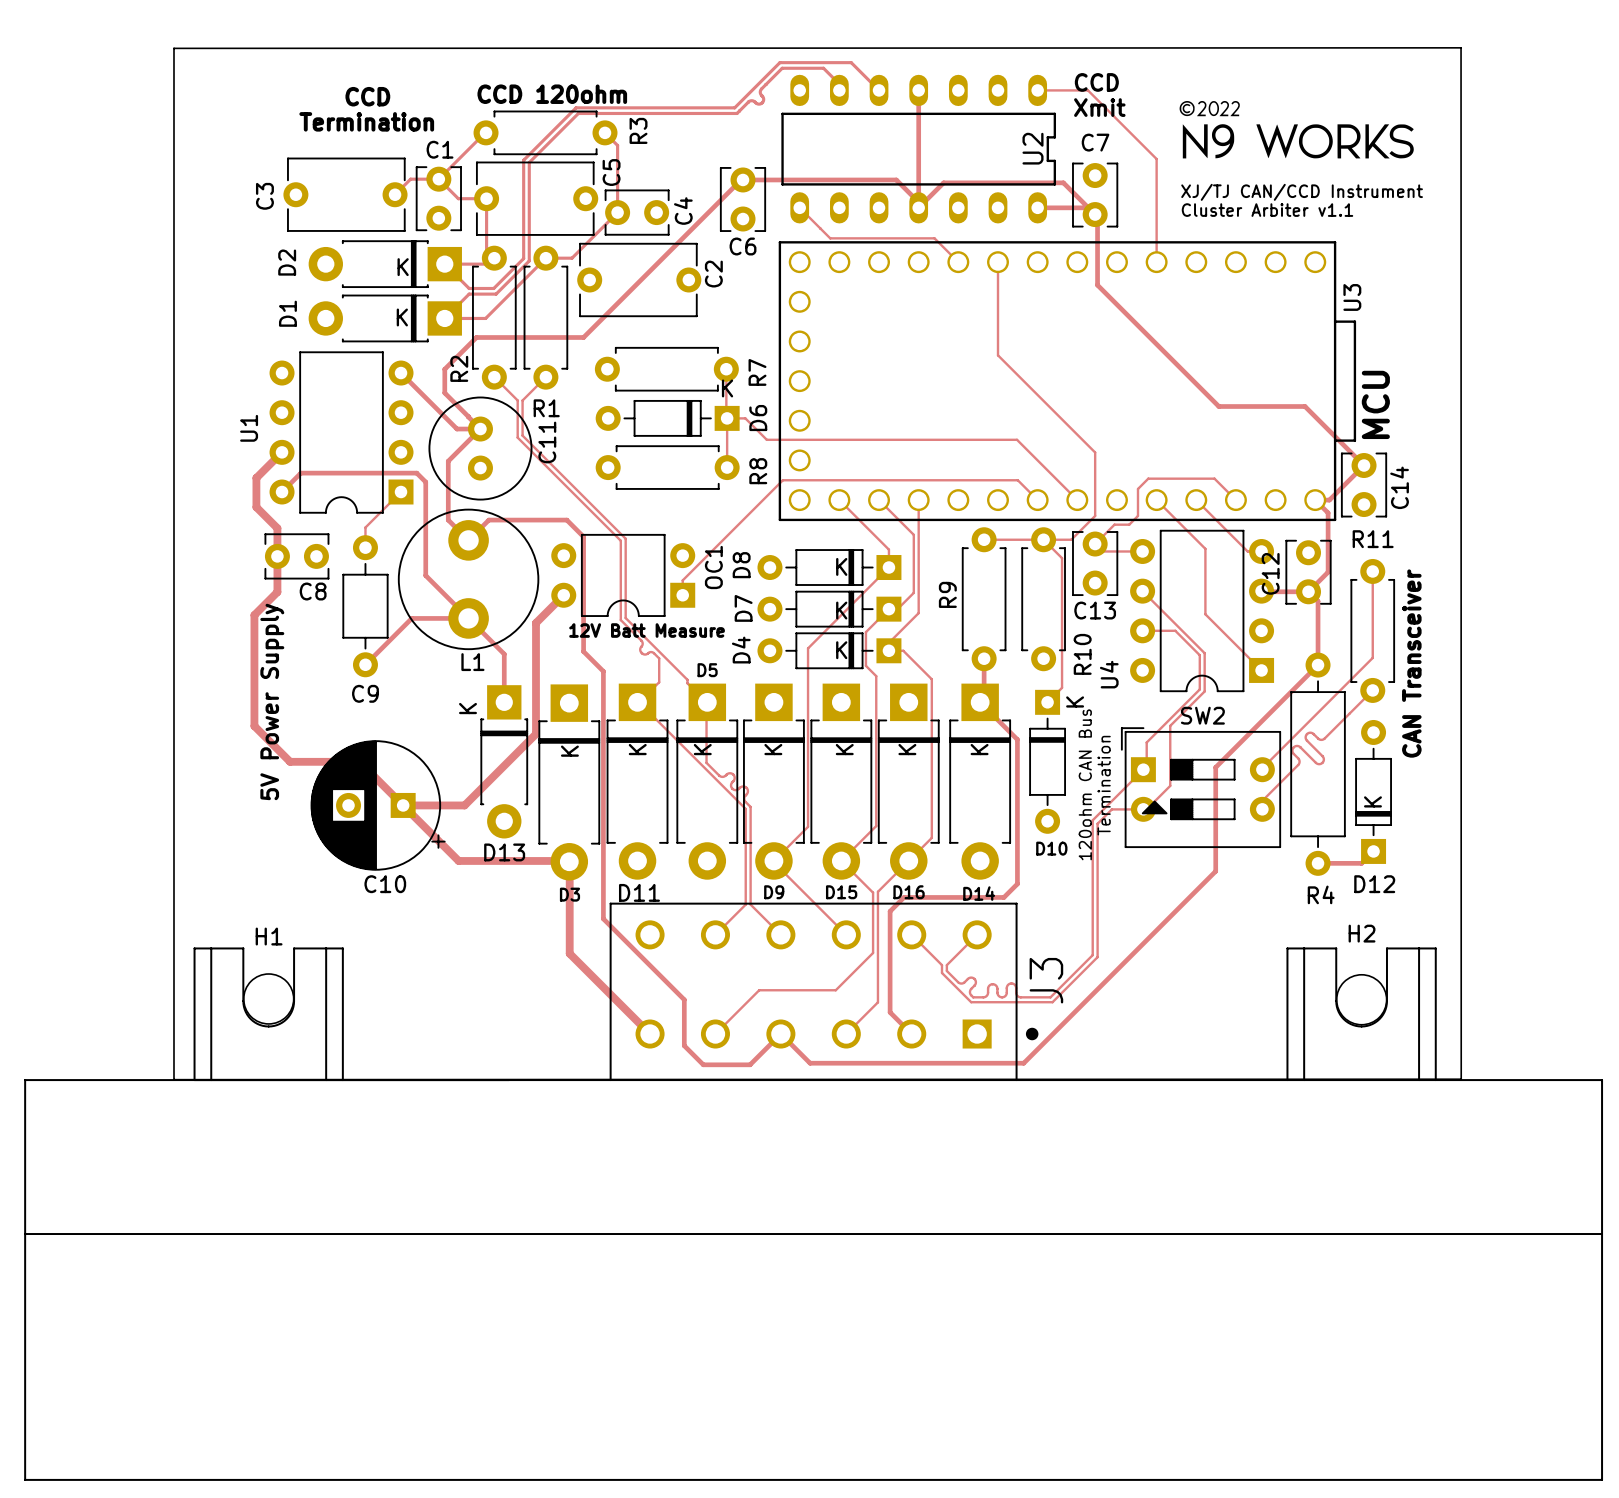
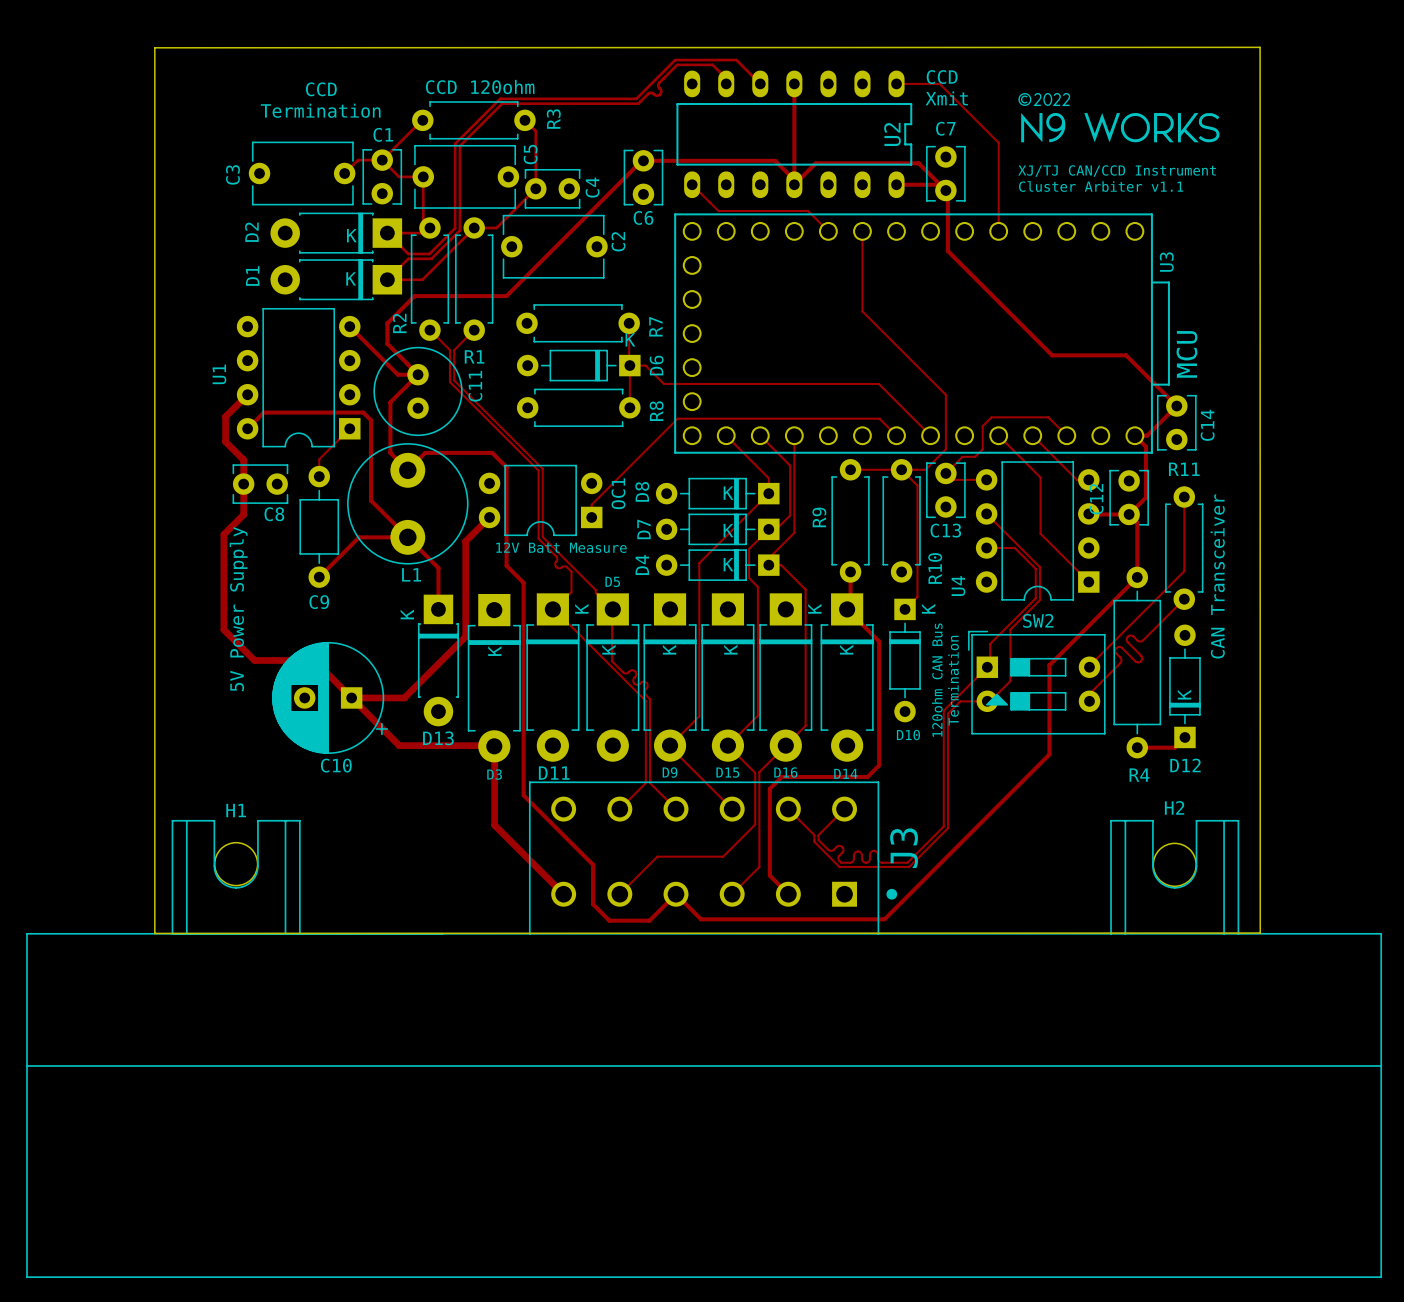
D11 text position: K (637, 749) -> K (581, 608)
D16 text position: K (907, 749) -> K (814, 608)

